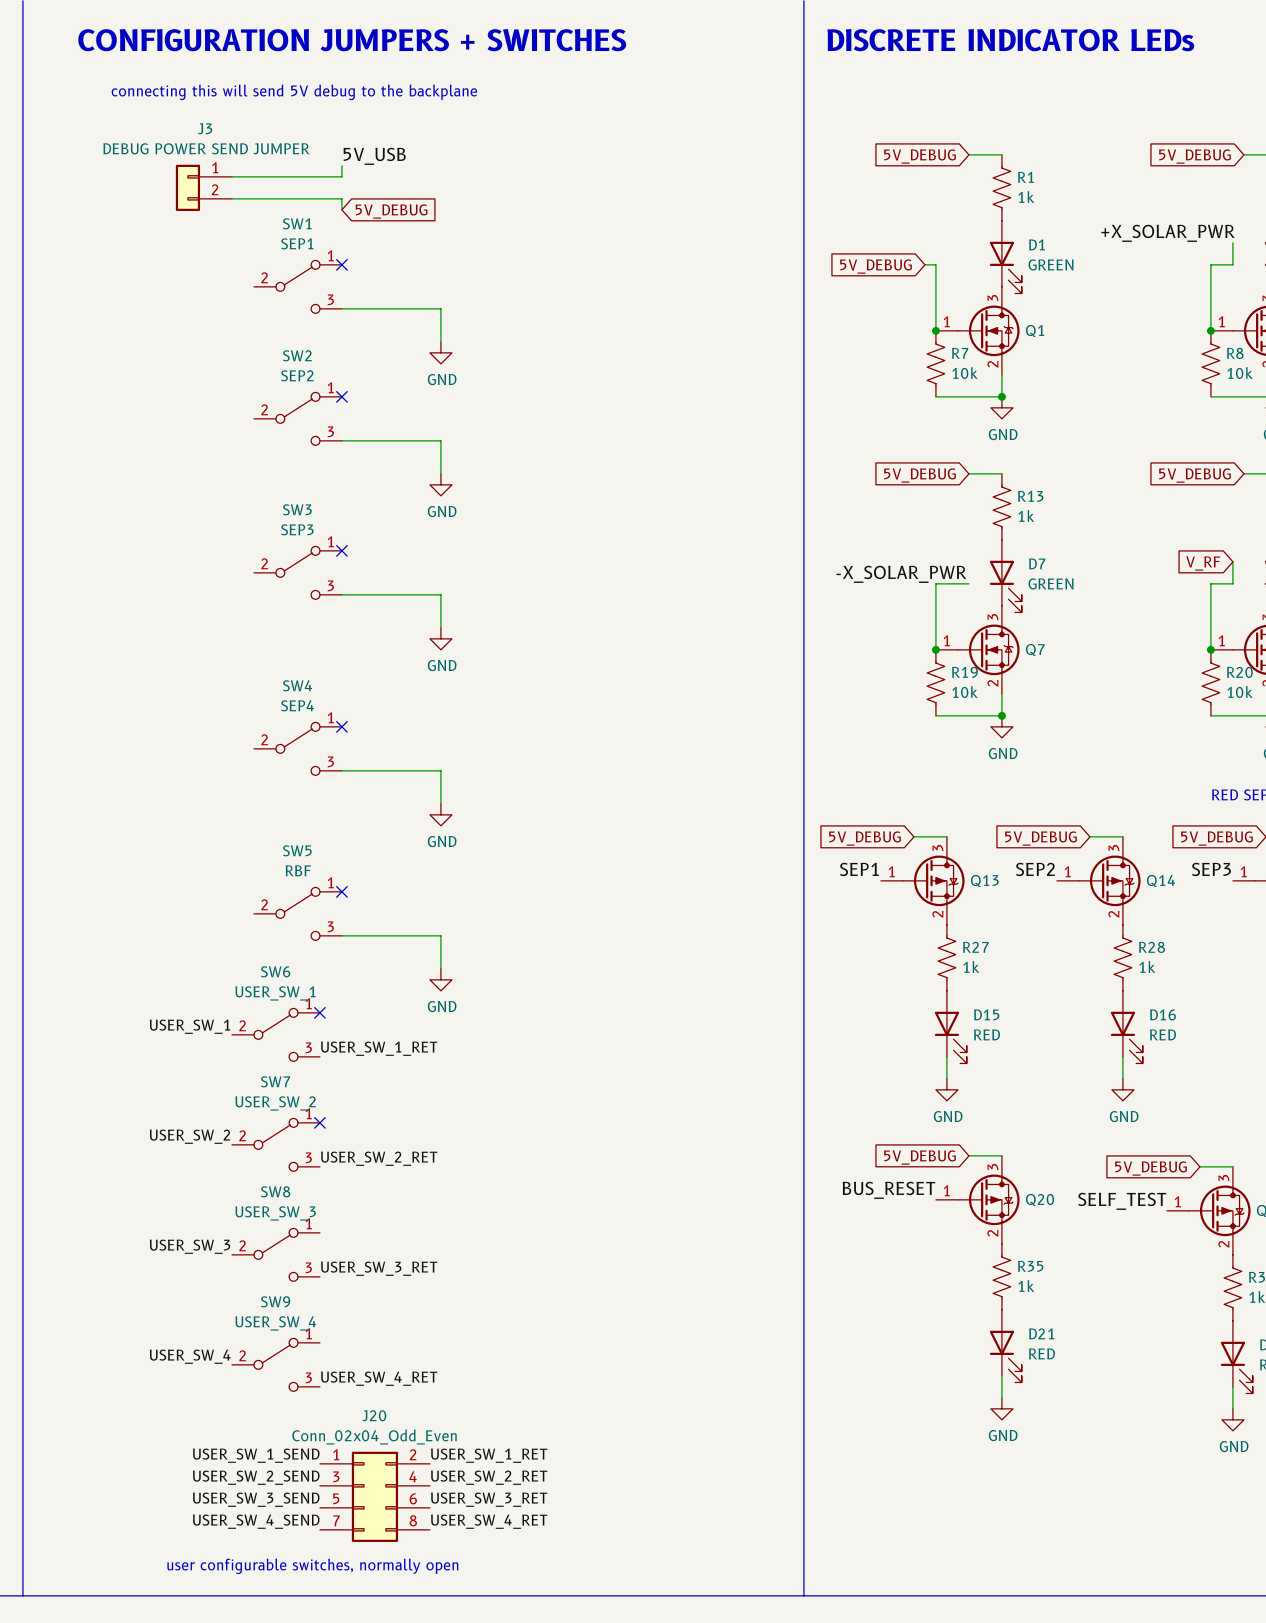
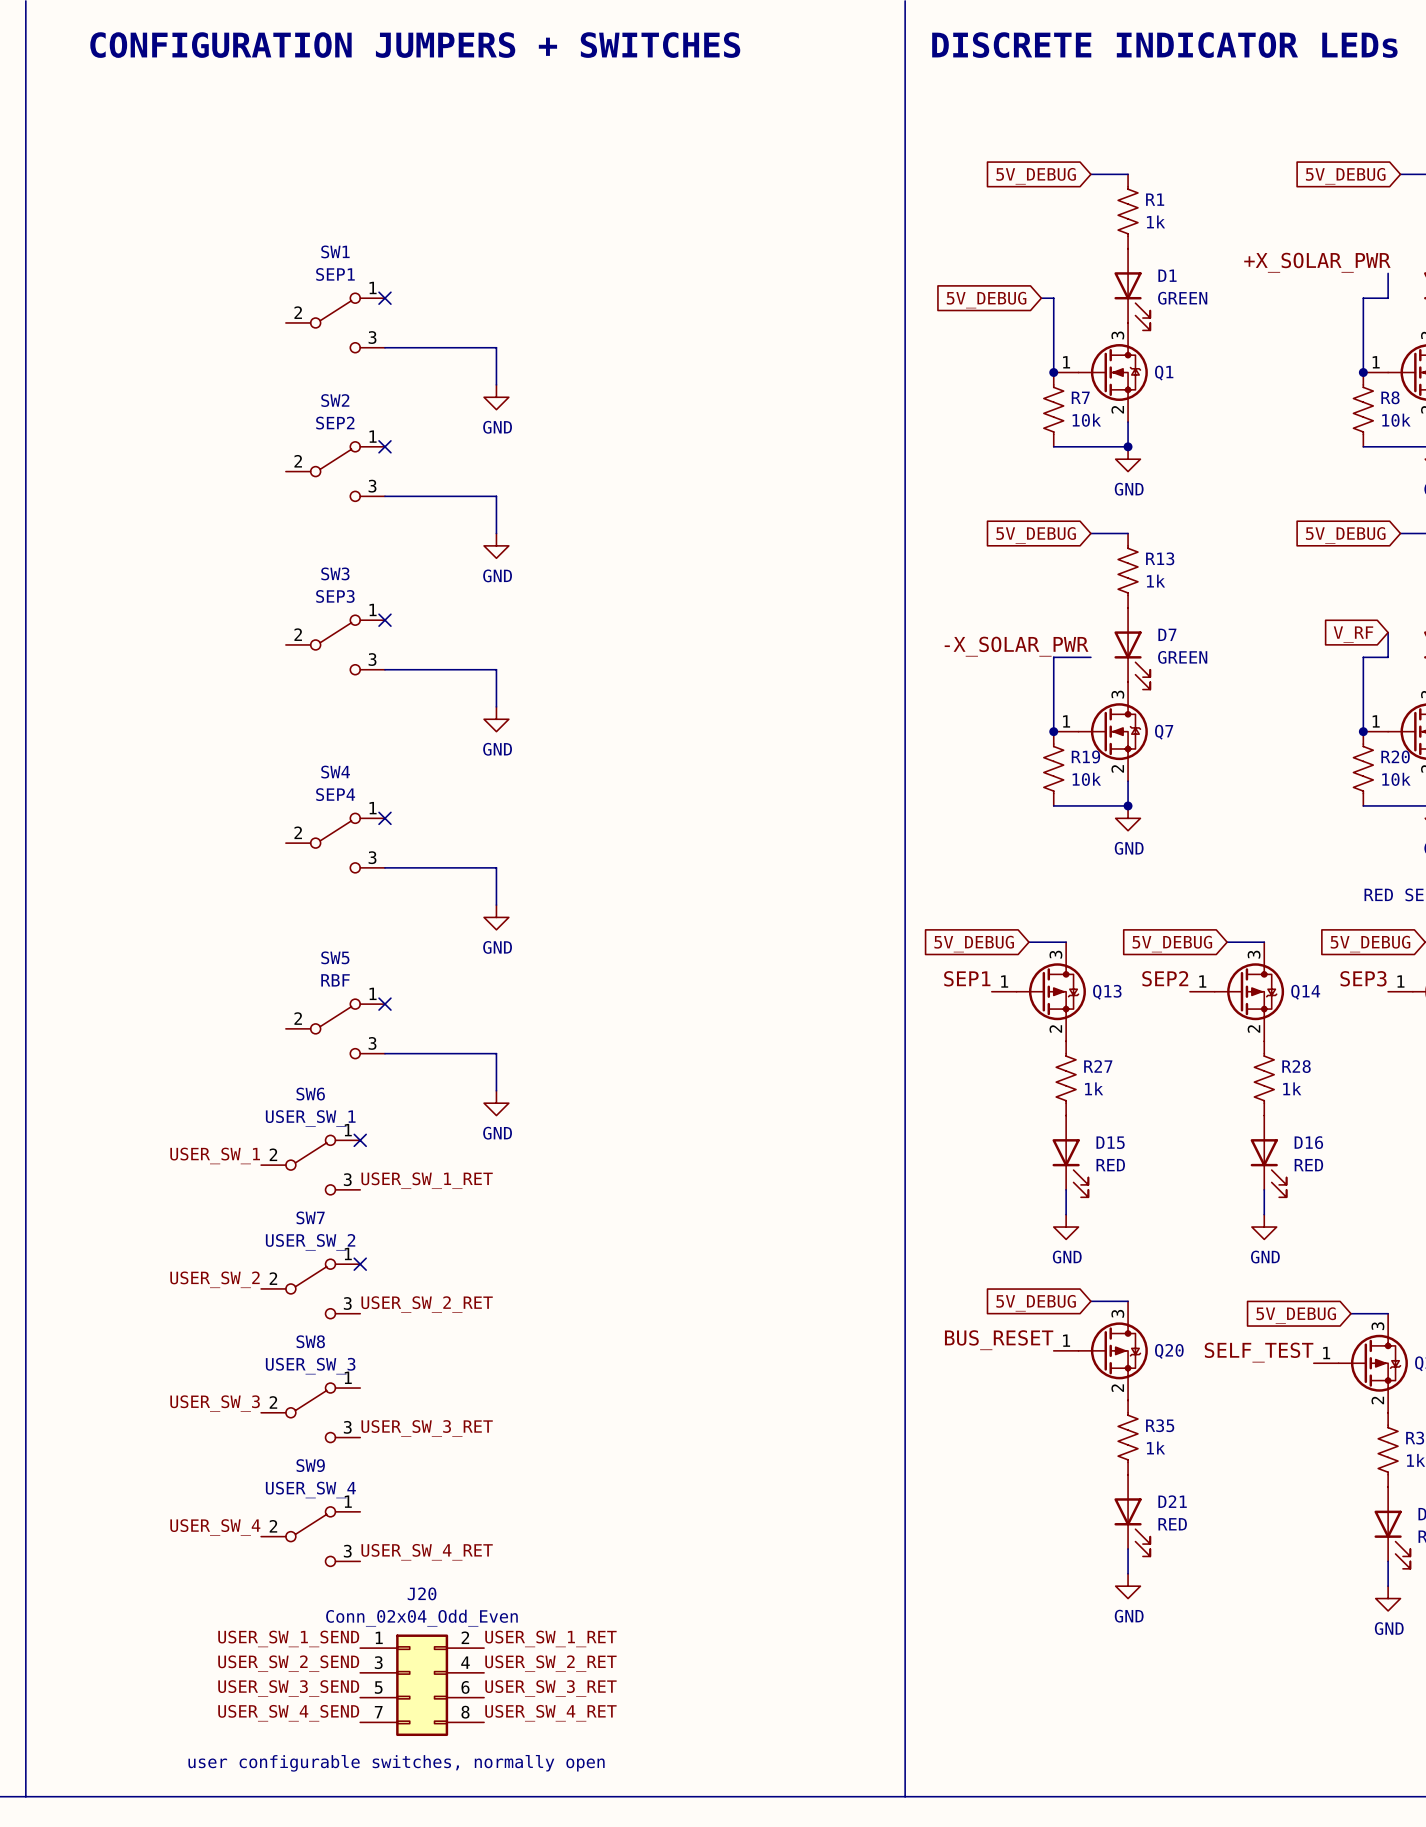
text: connecting this will send 5V debug to the backplane (294, 92) -> none
label: 5V_USB (374, 156) -> none
wire: (341, 165) (341, 176) (231, 176) -> none
J3: DEBUG POWER SEND JUMPER (203, 187) -> none
wire: (231, 198) (341, 198) (341, 209) -> none
global label: 5V_DEBUG (391, 211) -> none

